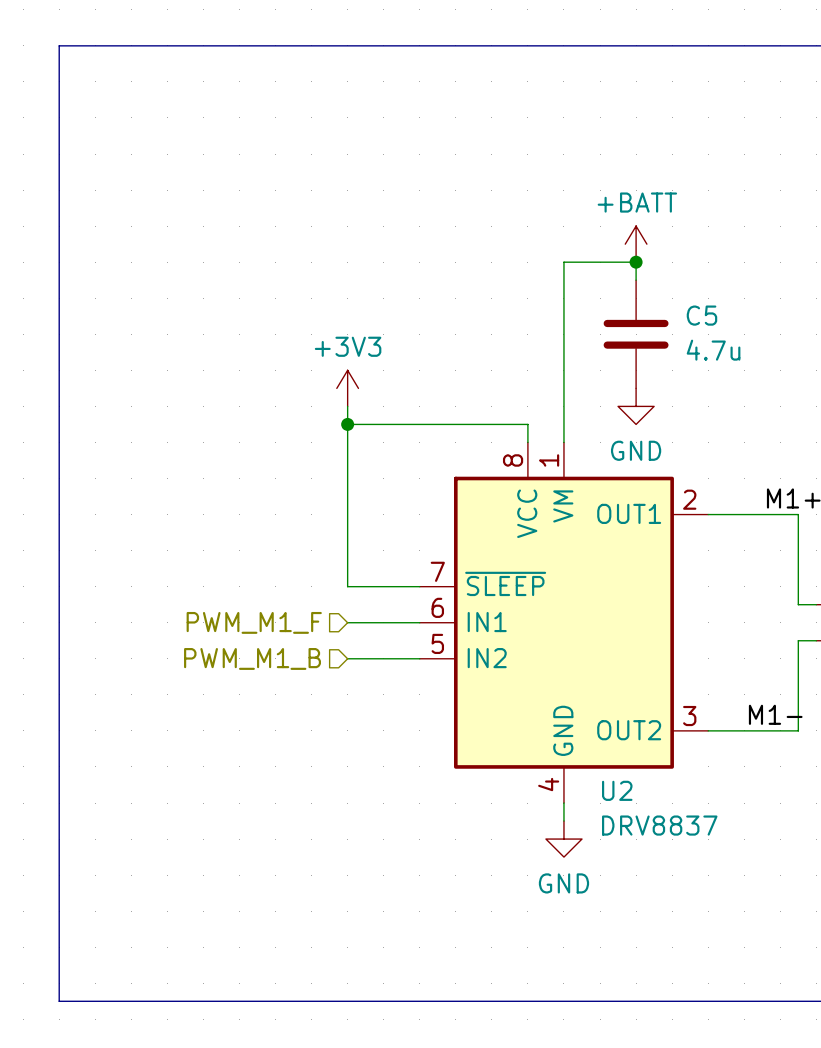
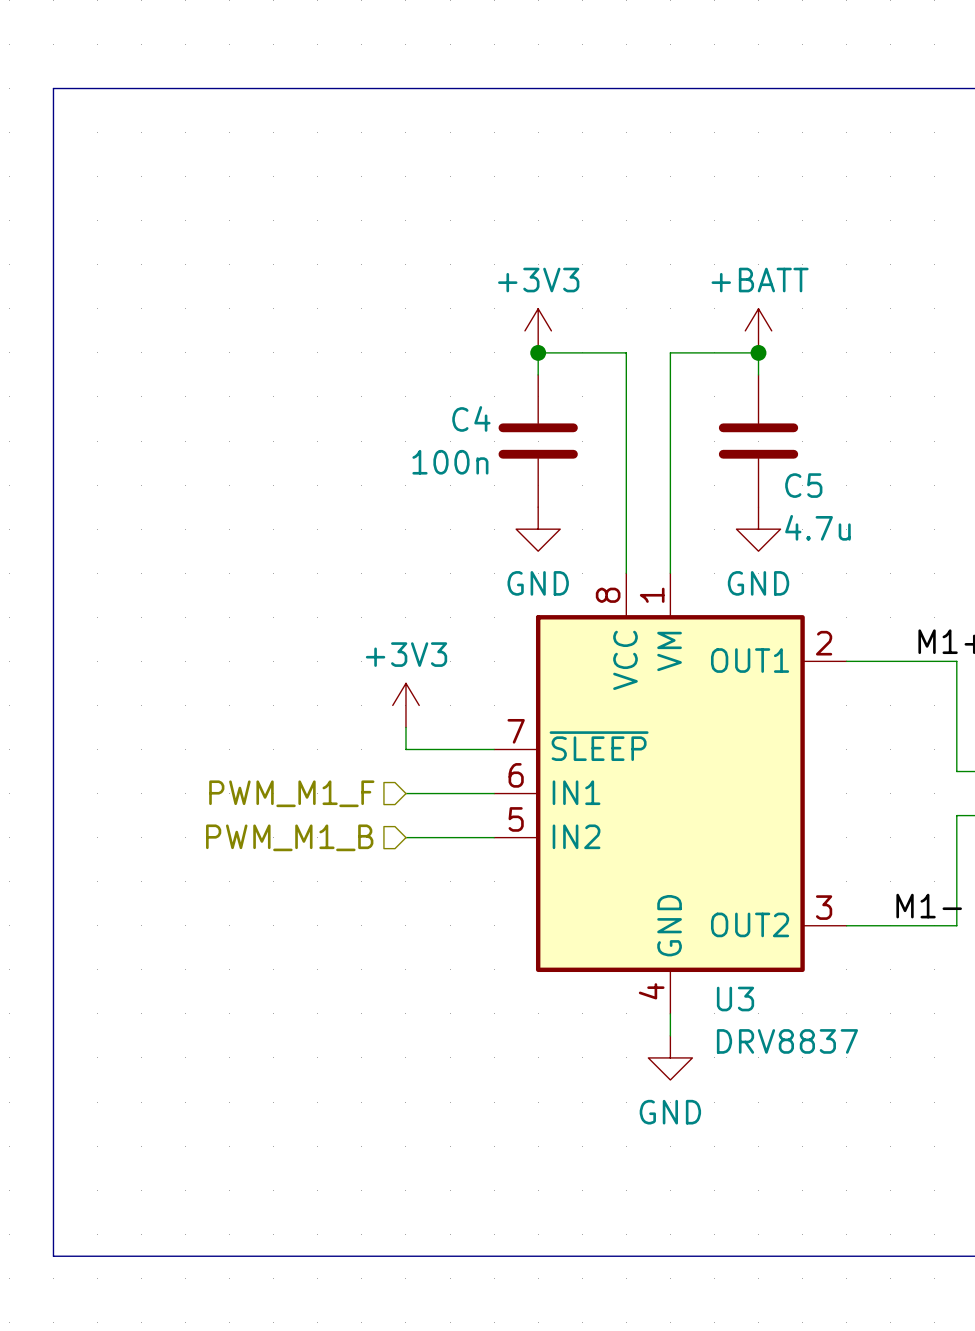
power symbol: none -> +3V3 (538, 330)
junction: none -> (538, 352)
C5 name position: C5 (701, 315) -> C5 (803, 485)
C4: none -> 100n (538, 441)
C5 value position: 4.7u (713, 350) -> 4.7u (817, 527)
power symbol: +3V3 (347, 388) -> none
wire: (347, 406) (347, 568) -> none
power symbol: none -> GND (538, 529)
wire: (347, 424) (527, 424) -> (538, 374) (538, 352) (626, 352) (626, 551)
junction: (347, 424) -> none
power symbol: none -> +3V3 (405, 705)
U2 name: U2 (617, 790) -> U3 (735, 999)

